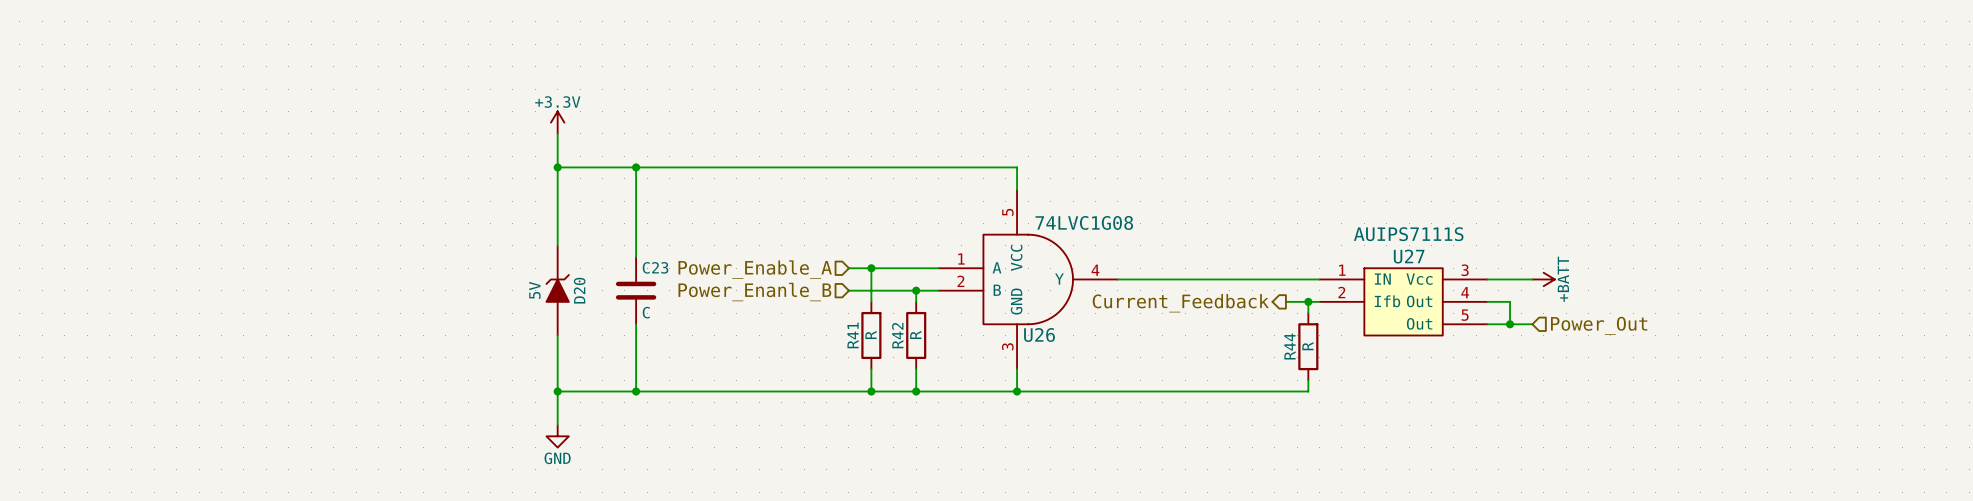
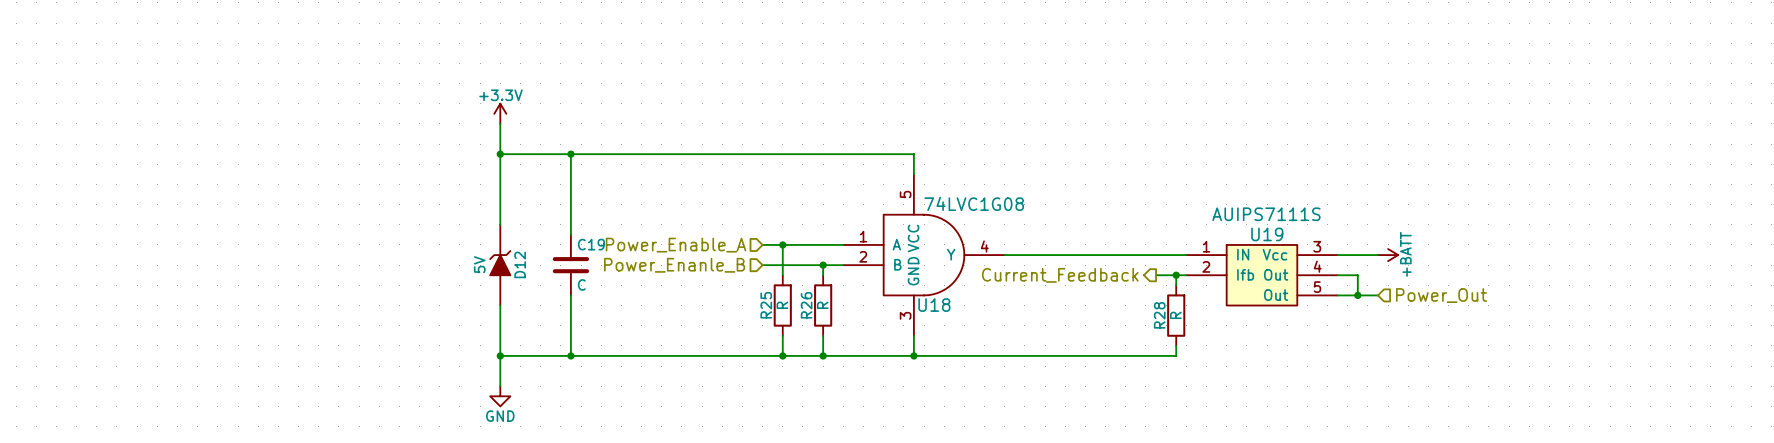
U27 name: U27 (1409, 256) -> U19 (1267, 234)
C23 name: C23 (655, 267) -> C19 (591, 244)
D20 name: D20 (579, 290) -> D12 (520, 264)
R41 name: R41 (853, 335) -> R25 (766, 305)
R42 name: R42 (897, 335) -> R26 (806, 305)
U26 name: U26 (1039, 335) -> U18 (934, 305)
R44 name: R44 (1289, 346) -> R28 (1159, 315)

